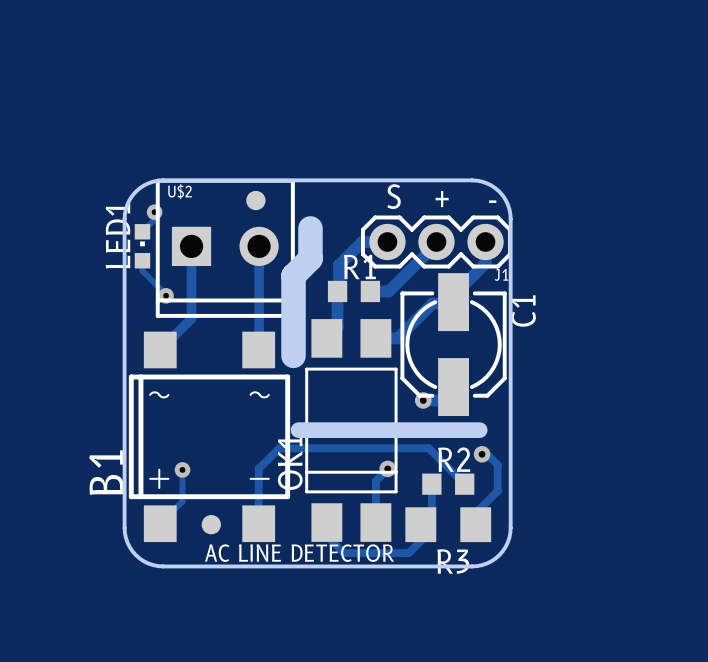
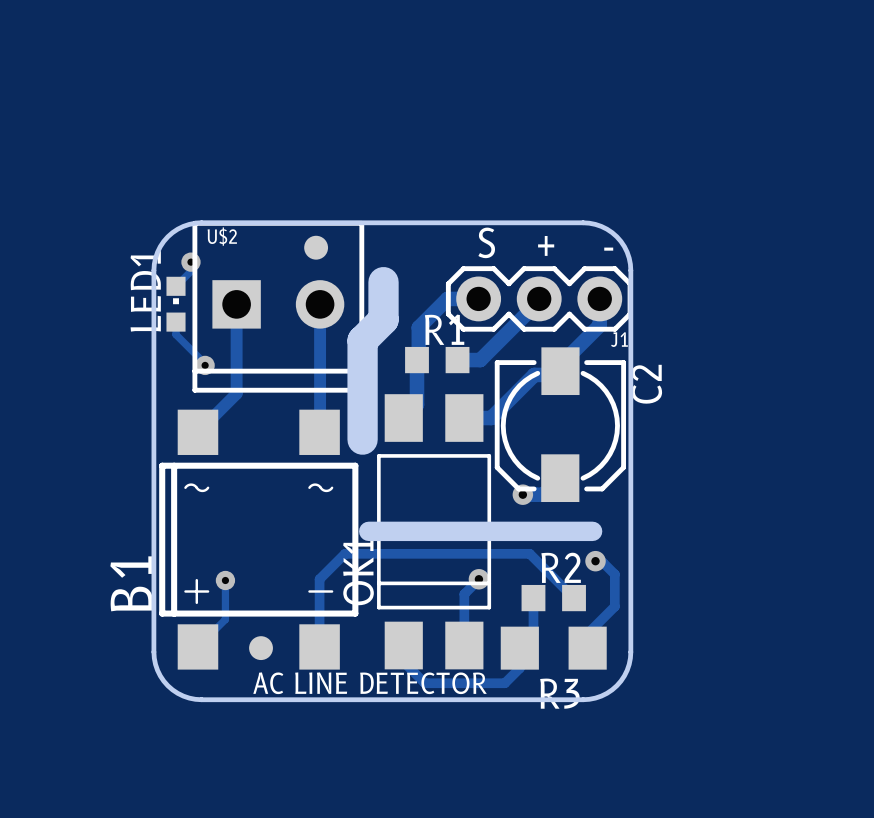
C2: none -> (560, 424)
C1: (453, 344) -> none

